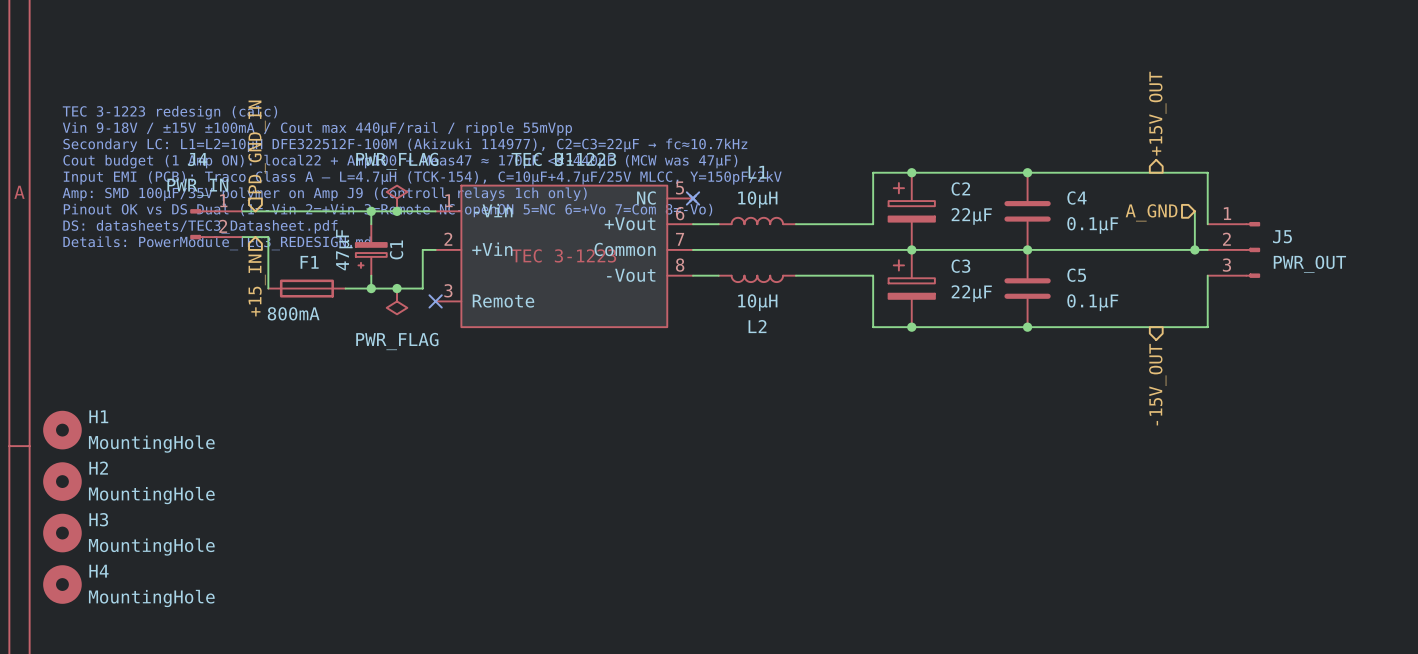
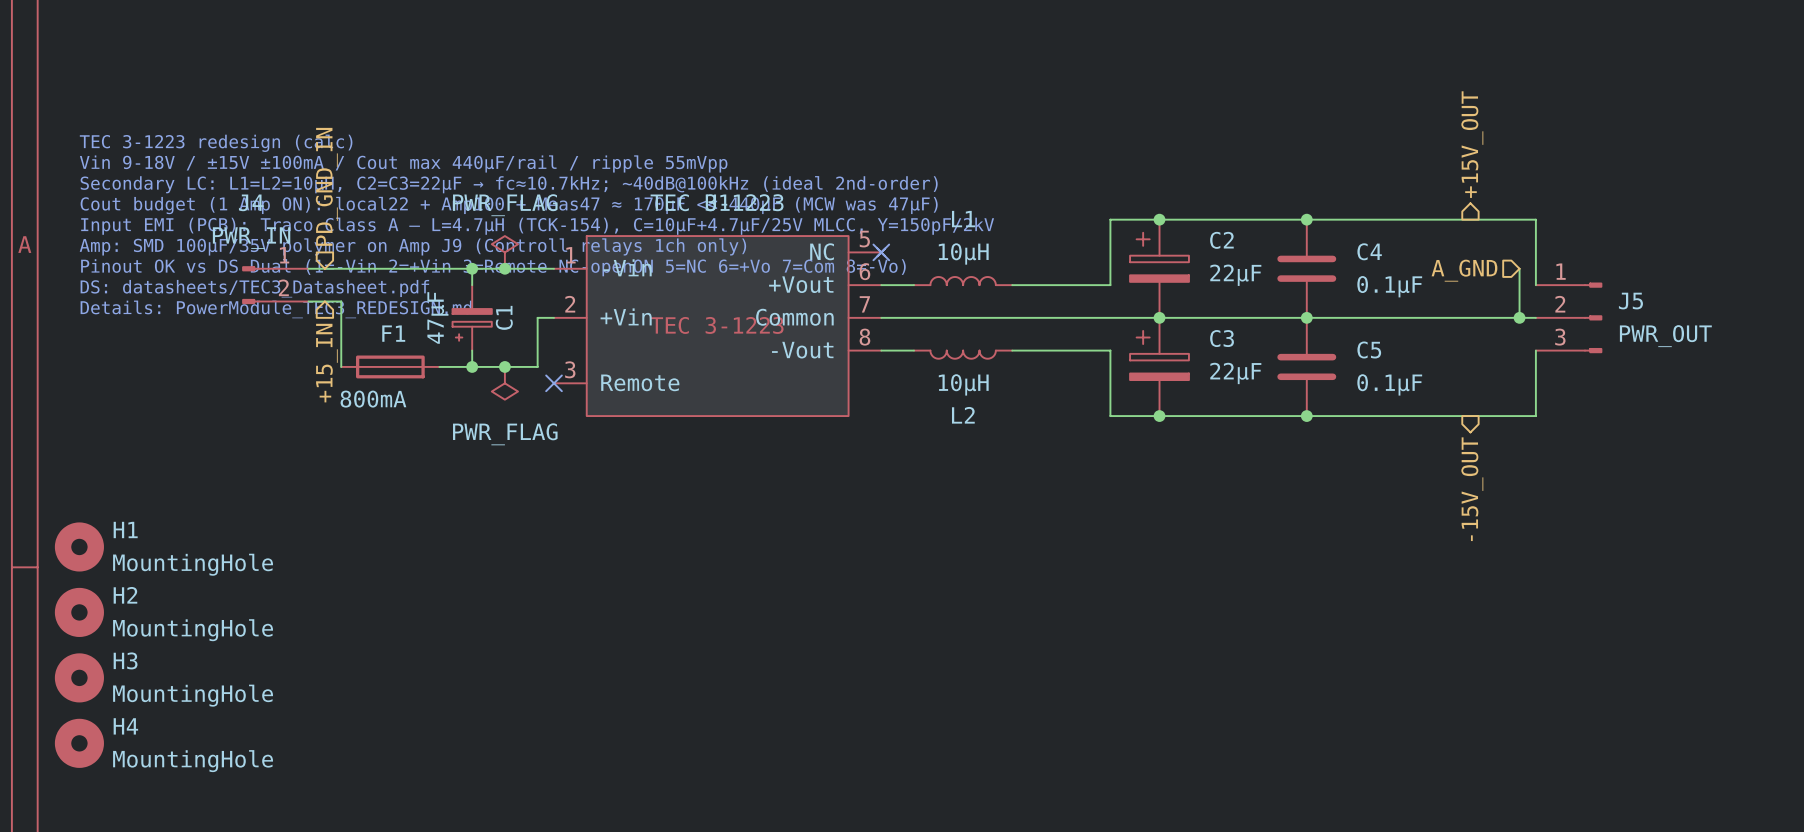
text: Secondary LC: L1=L2=10µH DFE322512F-100M (Akizuki 114977), C2=C3=22µF → fc≈10.7kHz (405, 145) -> Secondary LC: L1=L2=10µH, C2=C3=22µF → fc≈10.7kHz; ~40dB@100kHz (ideal 2nd-order) (509, 184)

